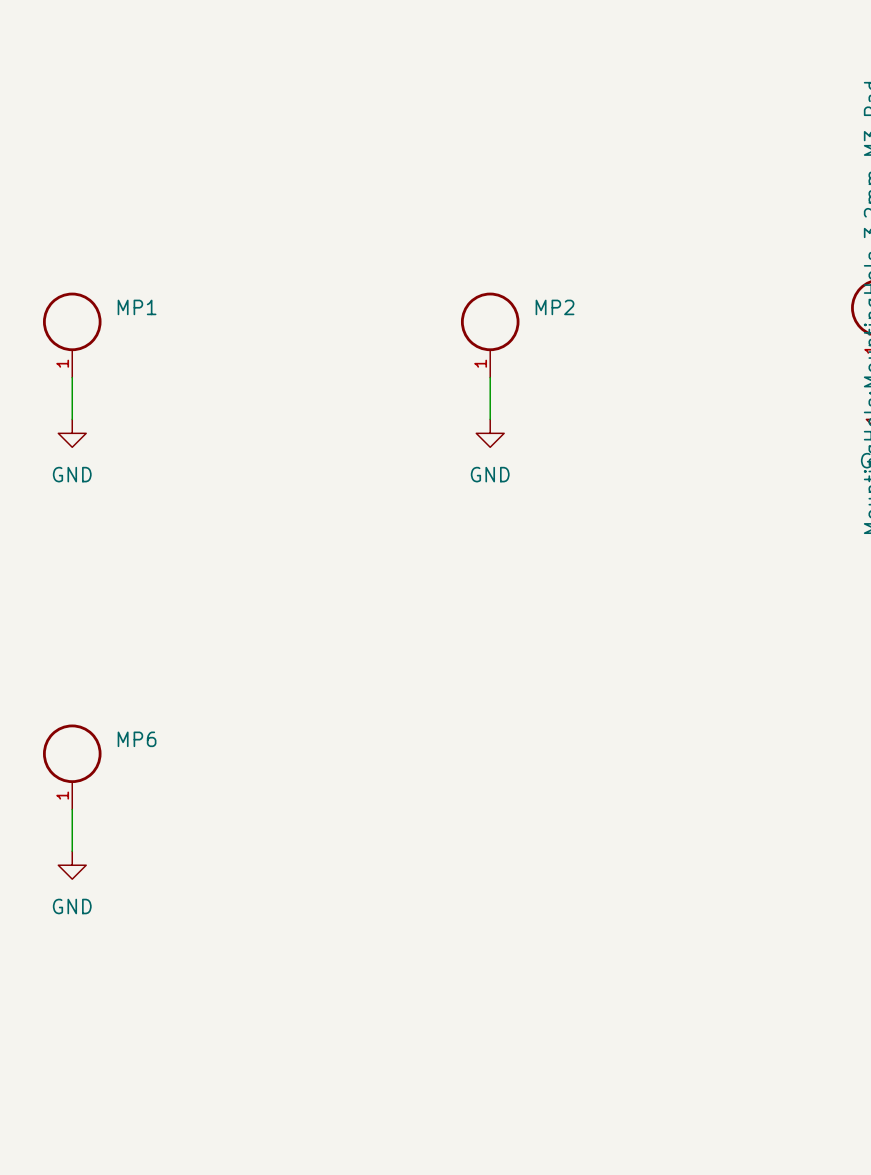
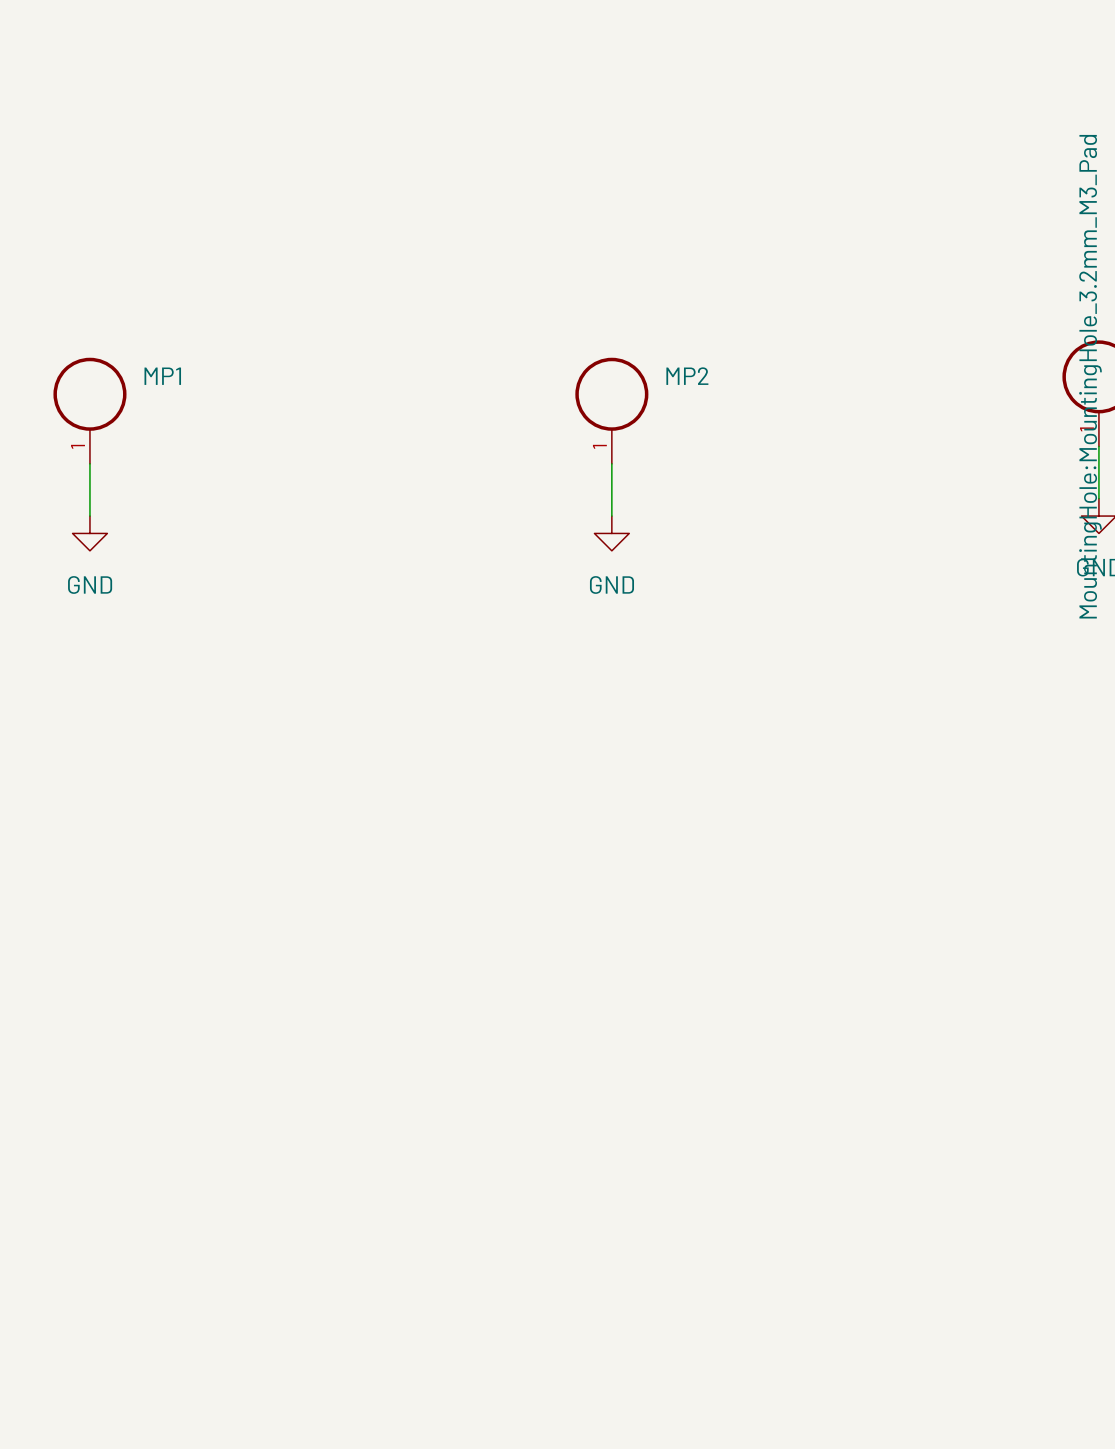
MP6: (72, 767) -> none
wire: (72, 809) (72, 851) -> none
power symbol: GND (72, 865) -> none

